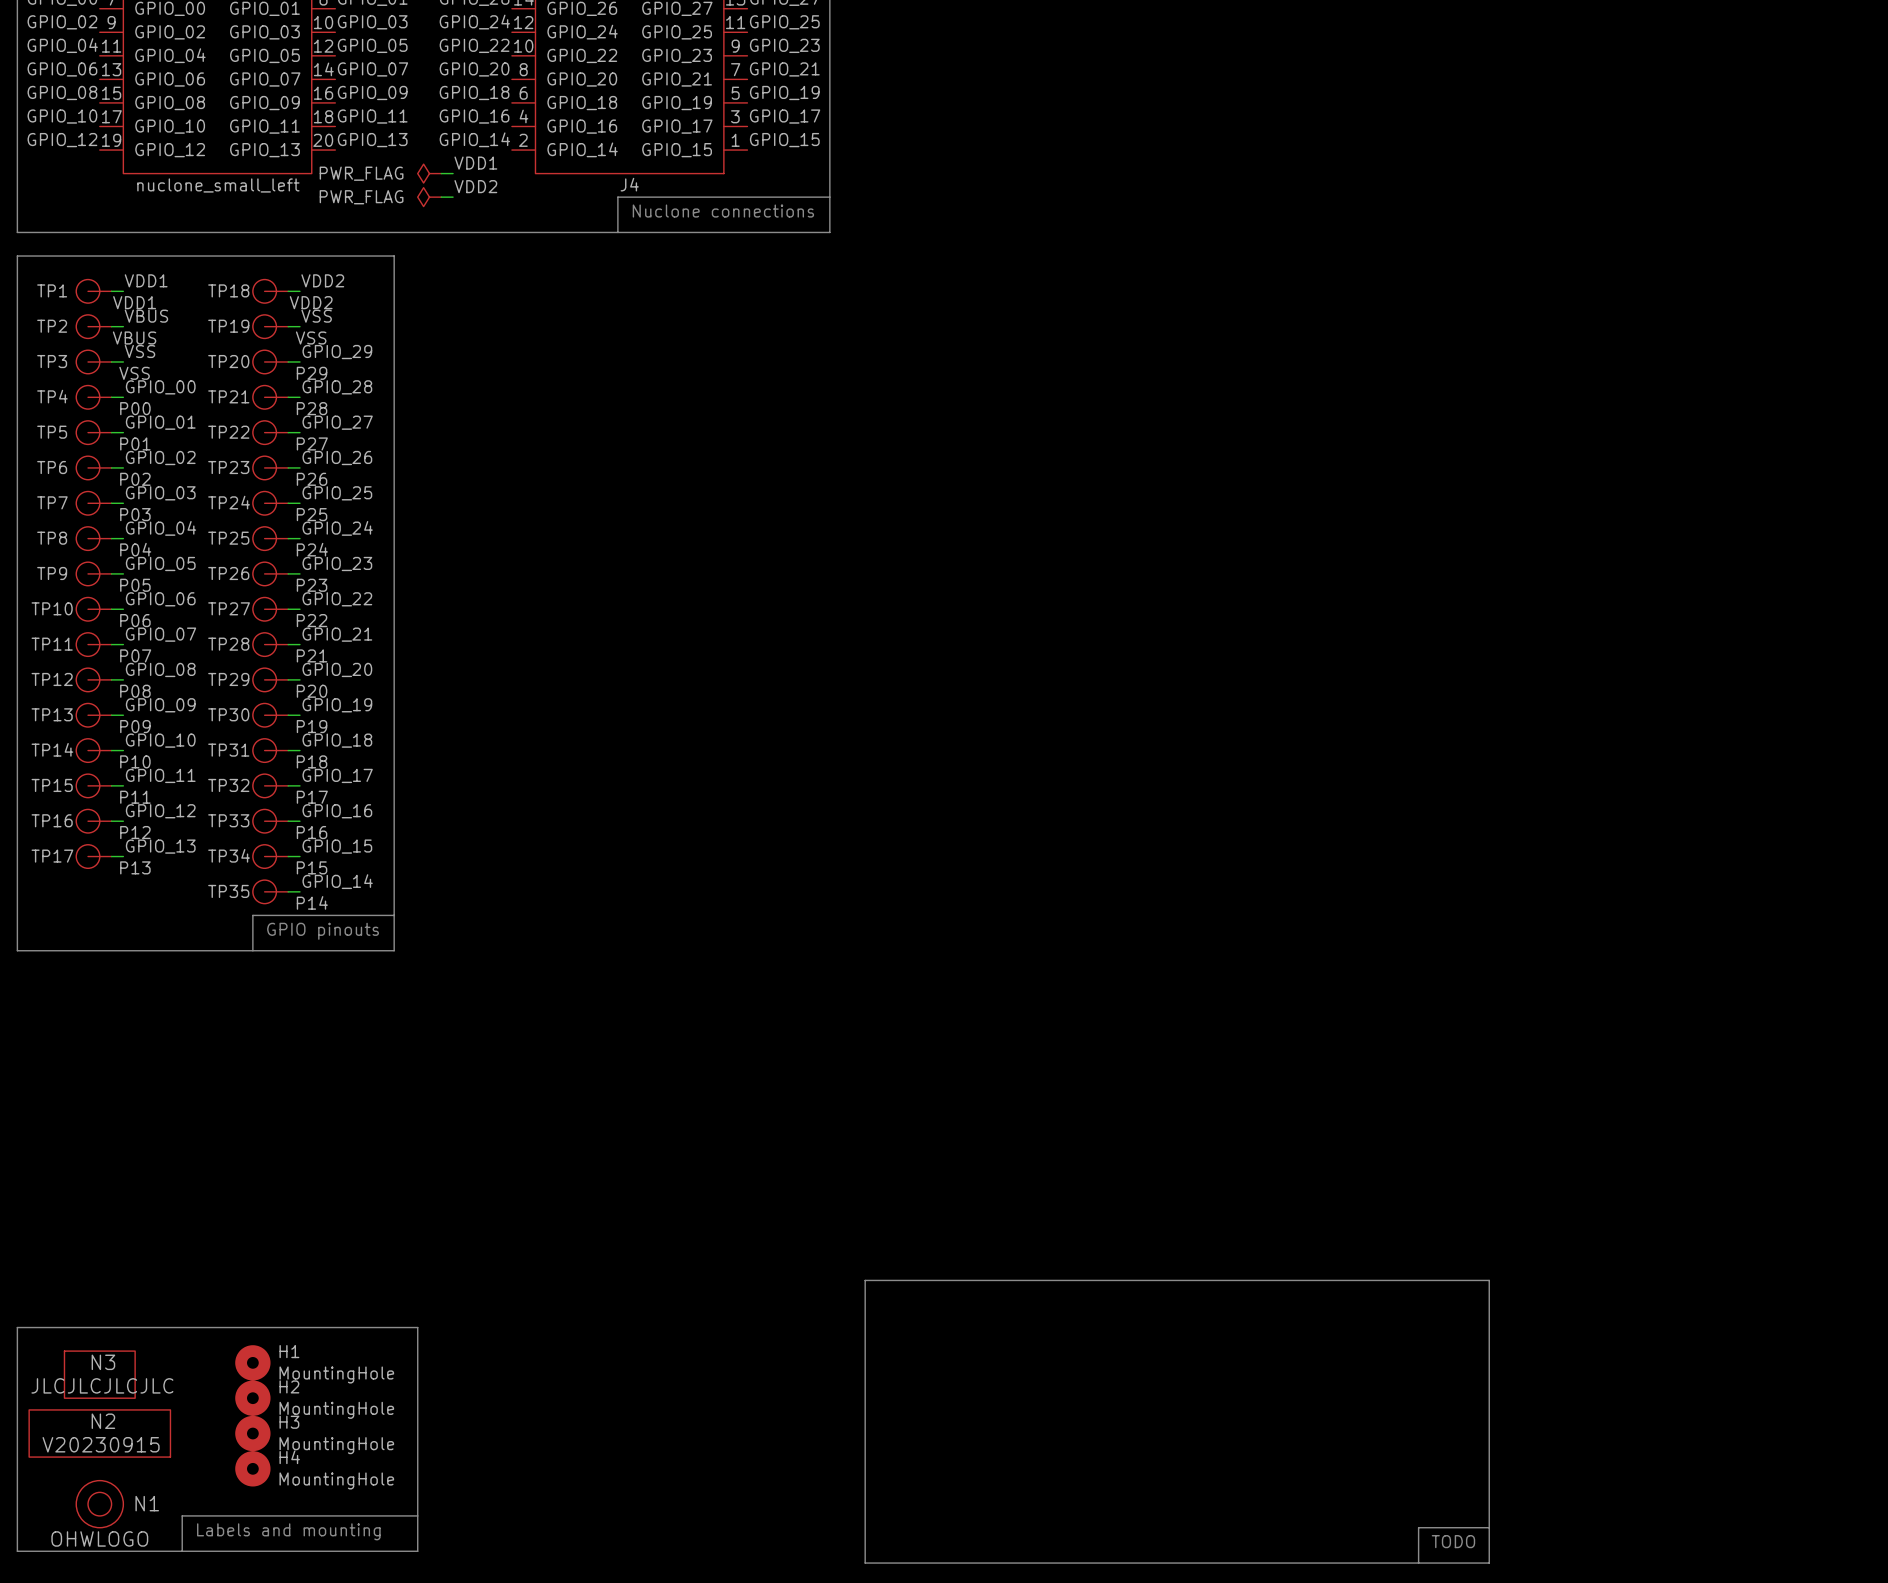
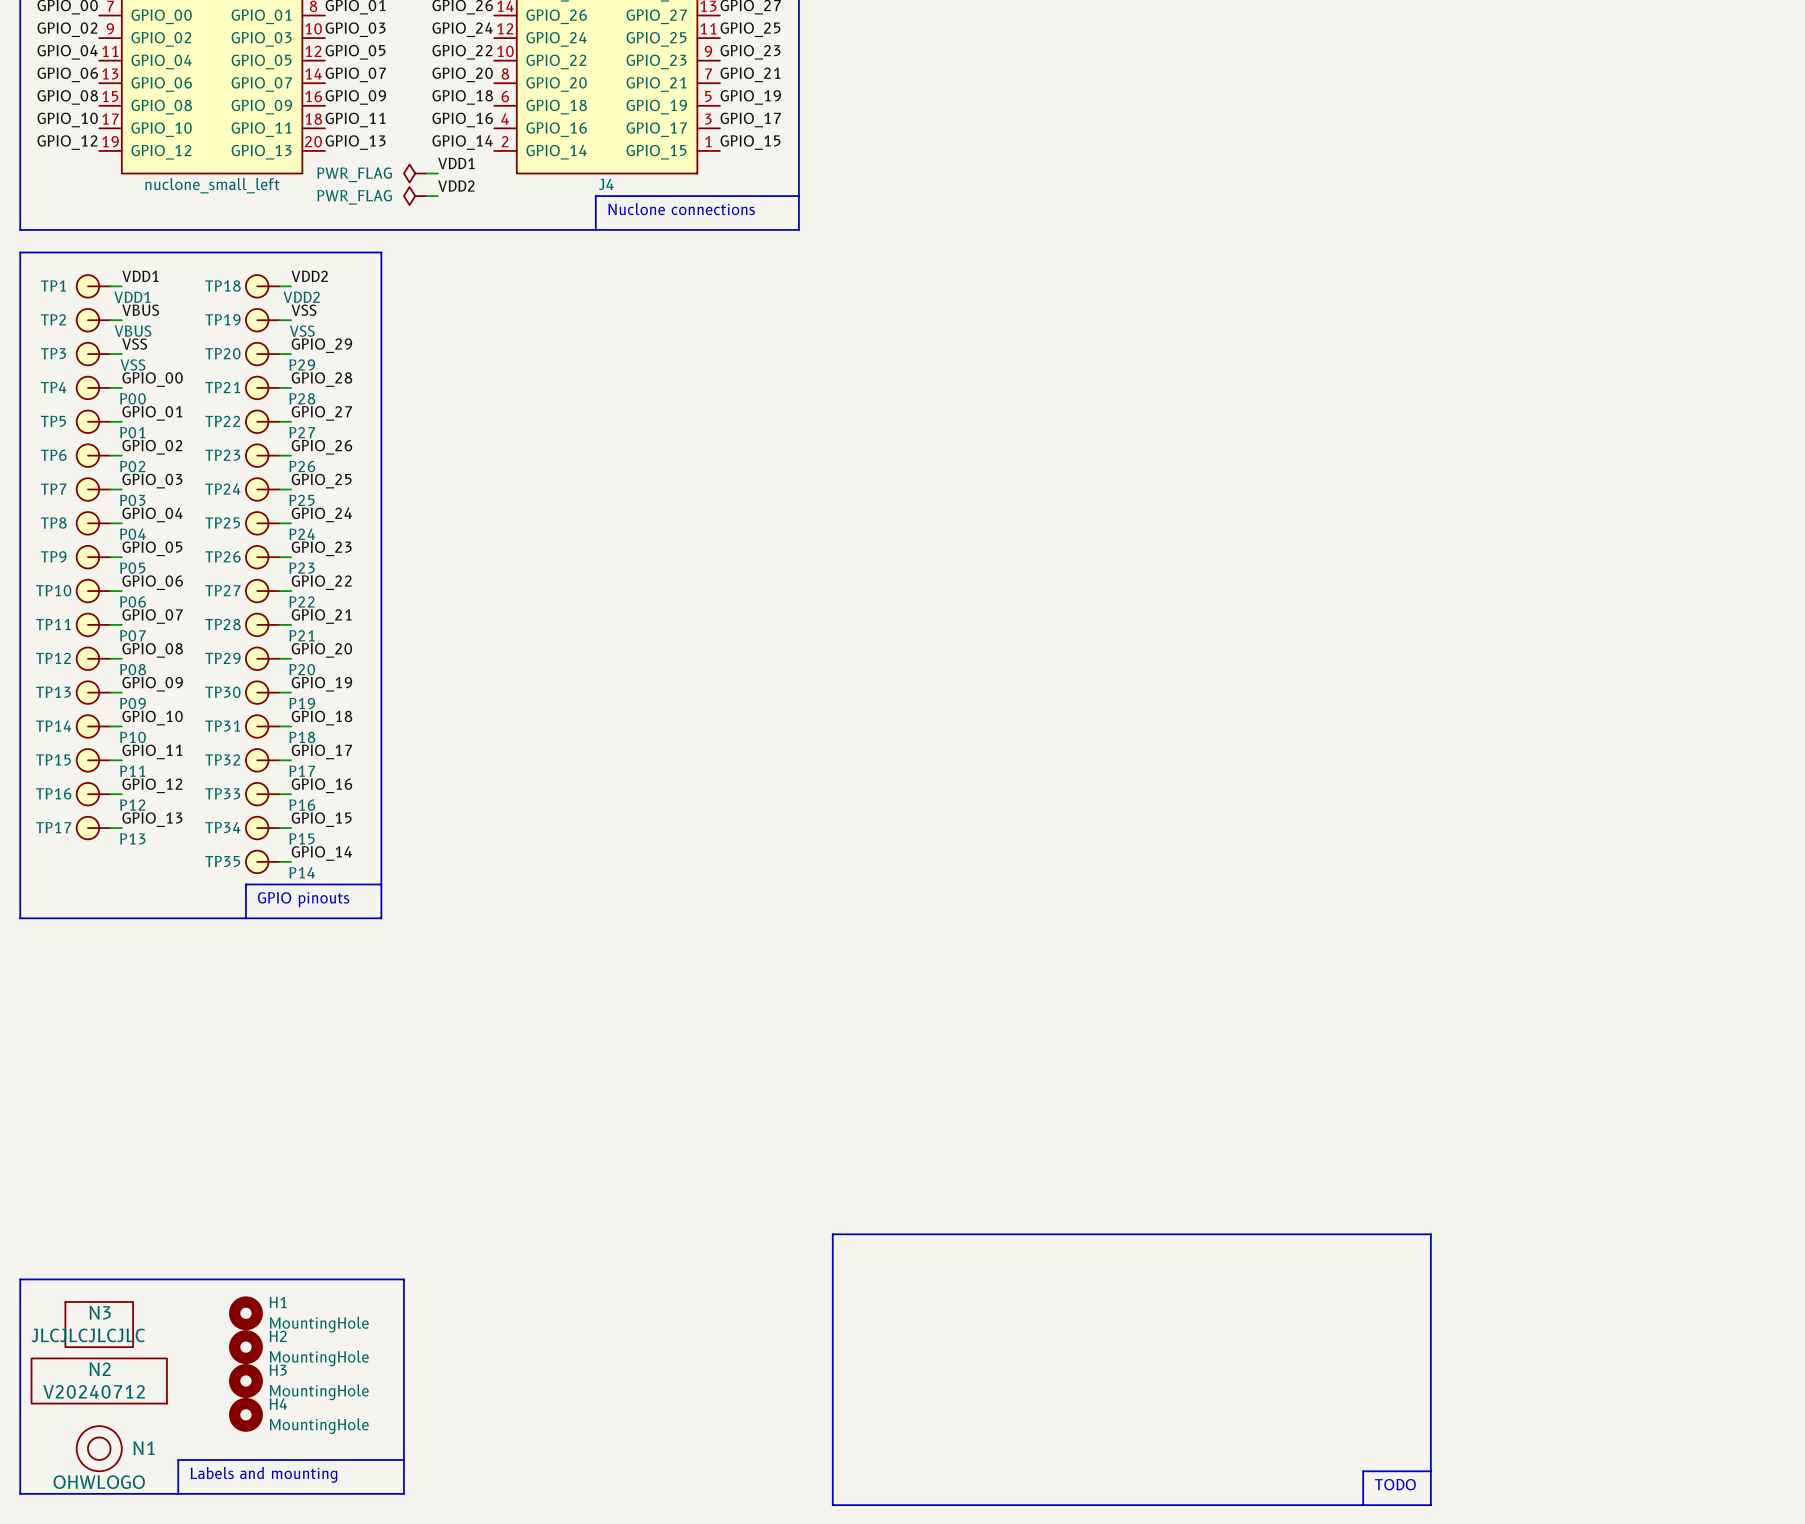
N2 value: V20230915 (101, 1444) -> V20240712 (94, 1391)

